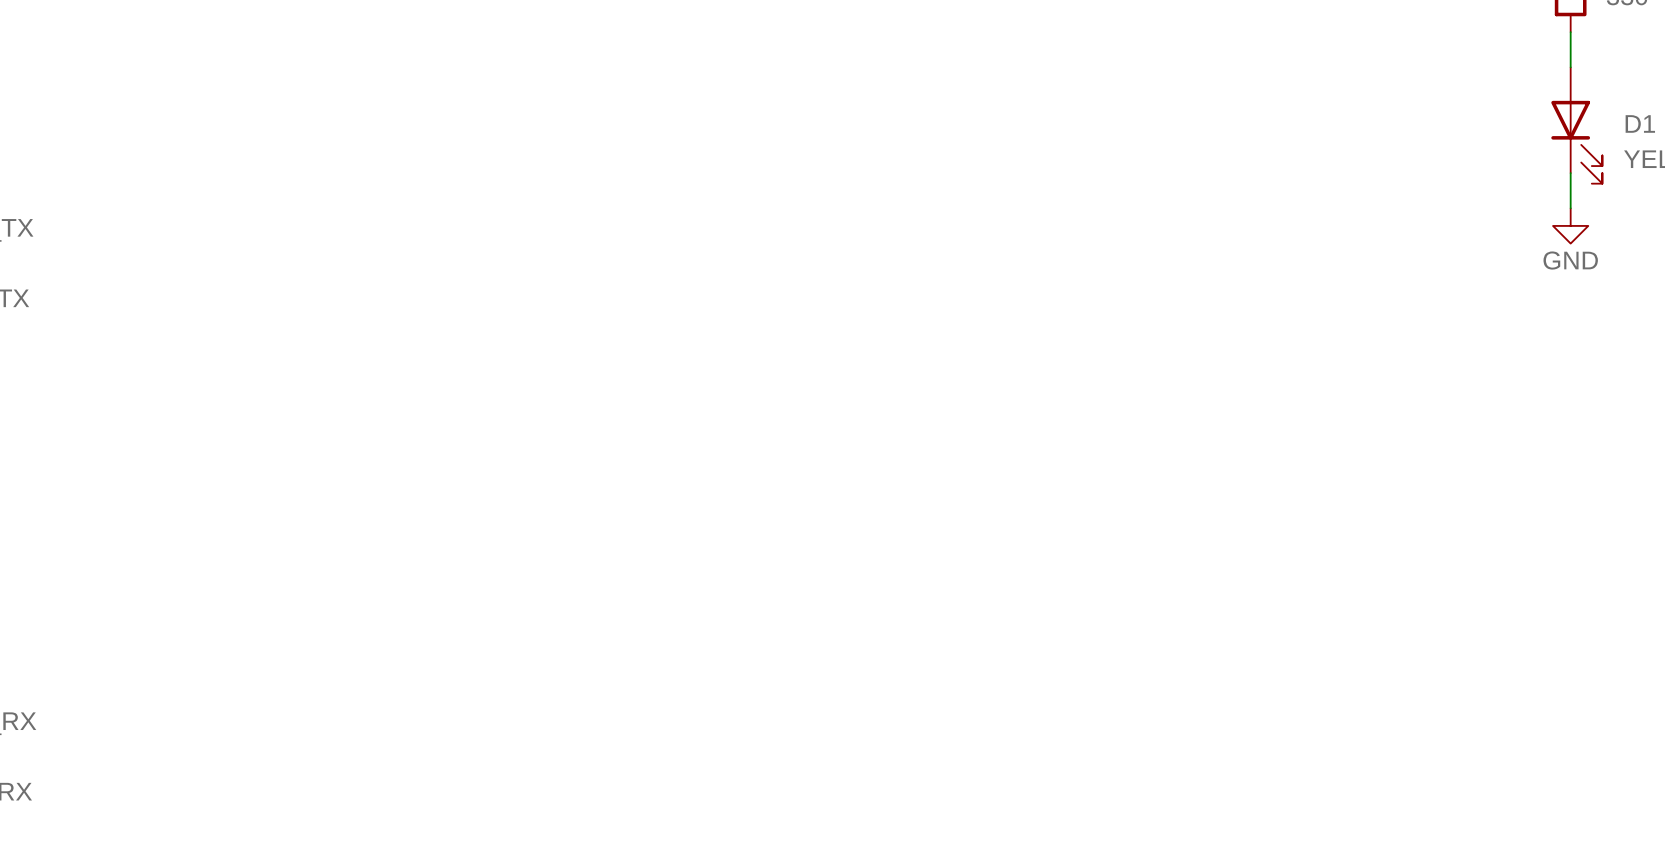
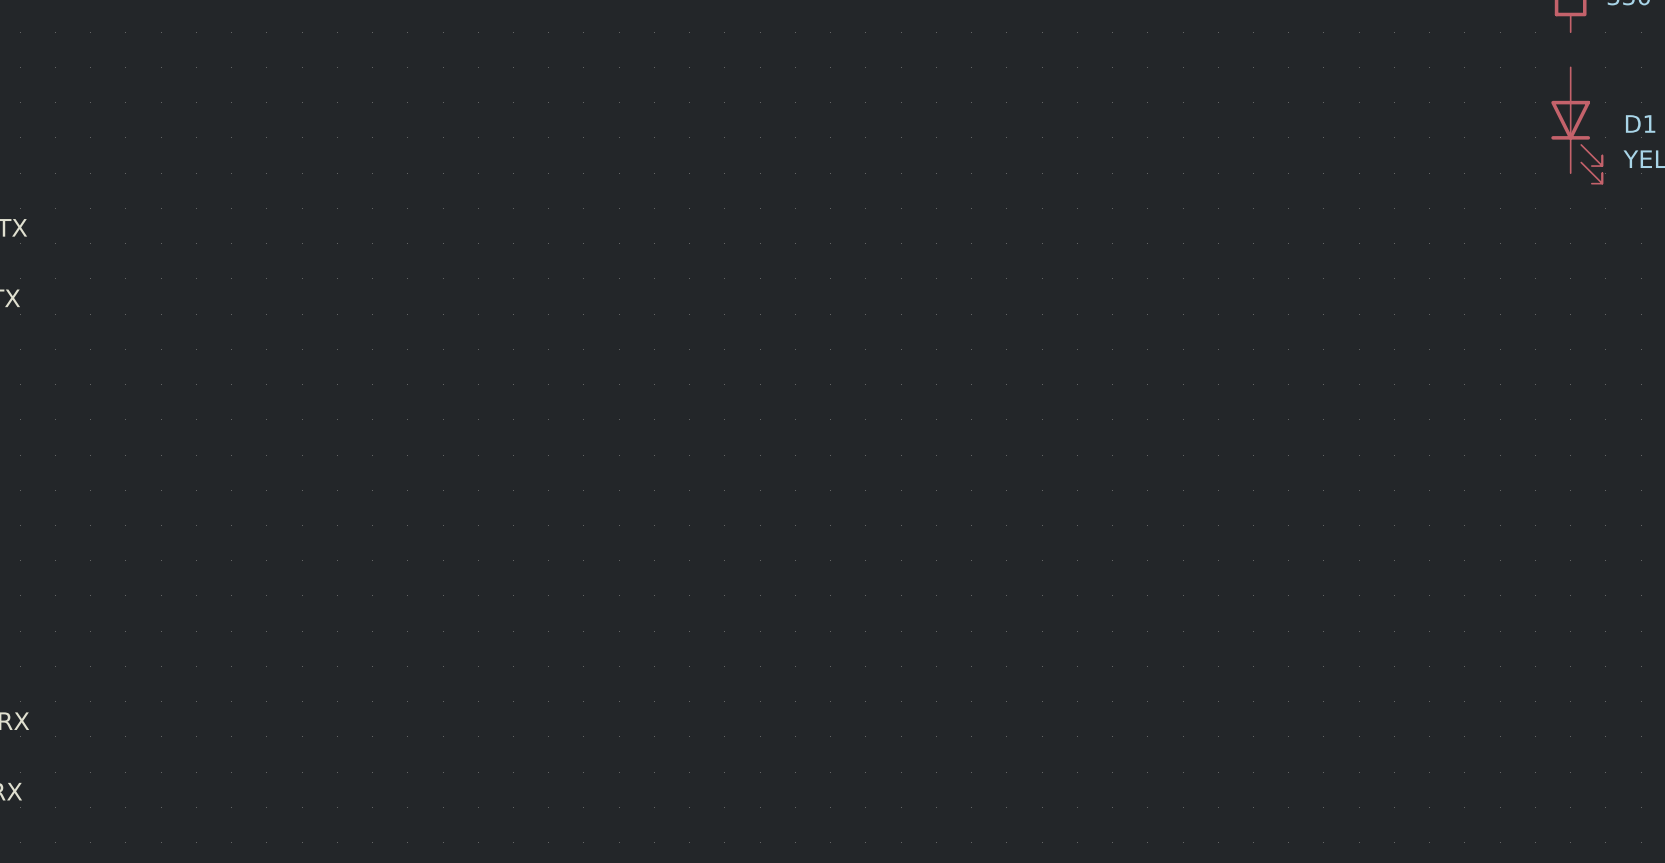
wire: (1570, 32) (1570, 67) -> none
wire: (1570, 173) (1570, 208) -> none
power symbol: GND (1570, 225) -> none

